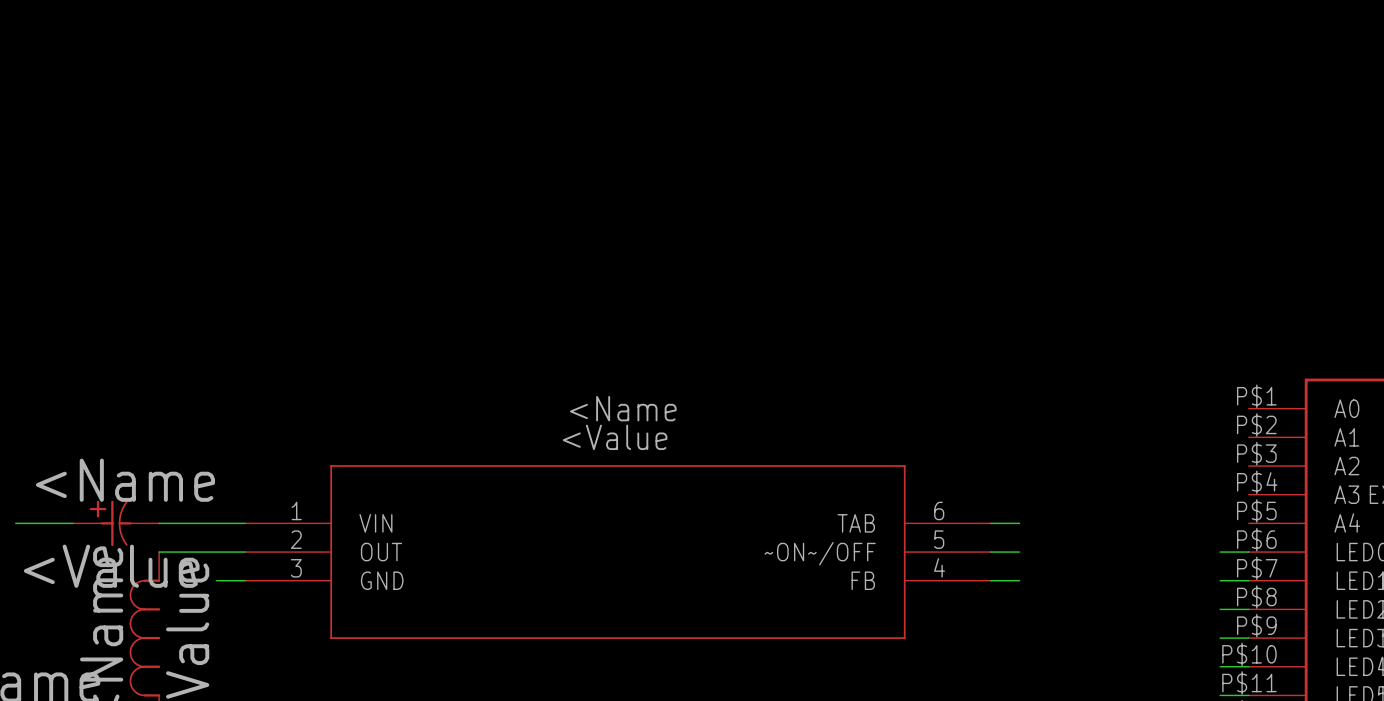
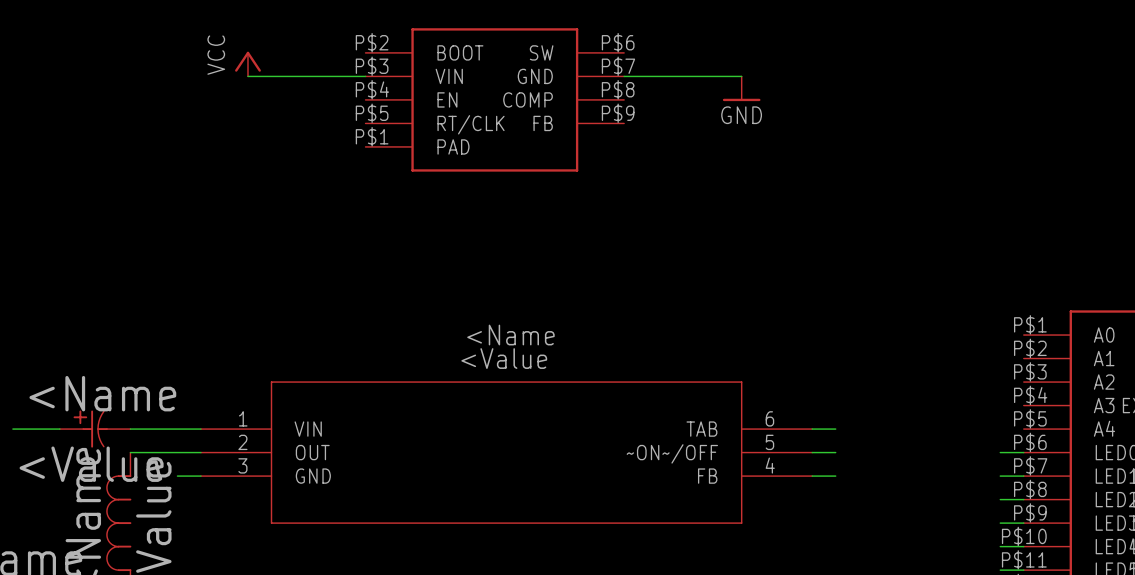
power symbol: none -> VCC (247, 64)
wire: none -> (247, 76) (365, 76)
wire: none -> (624, 76) (741, 76)
power symbol: none -> GND (741, 88)
part: none -> (494, 99)

